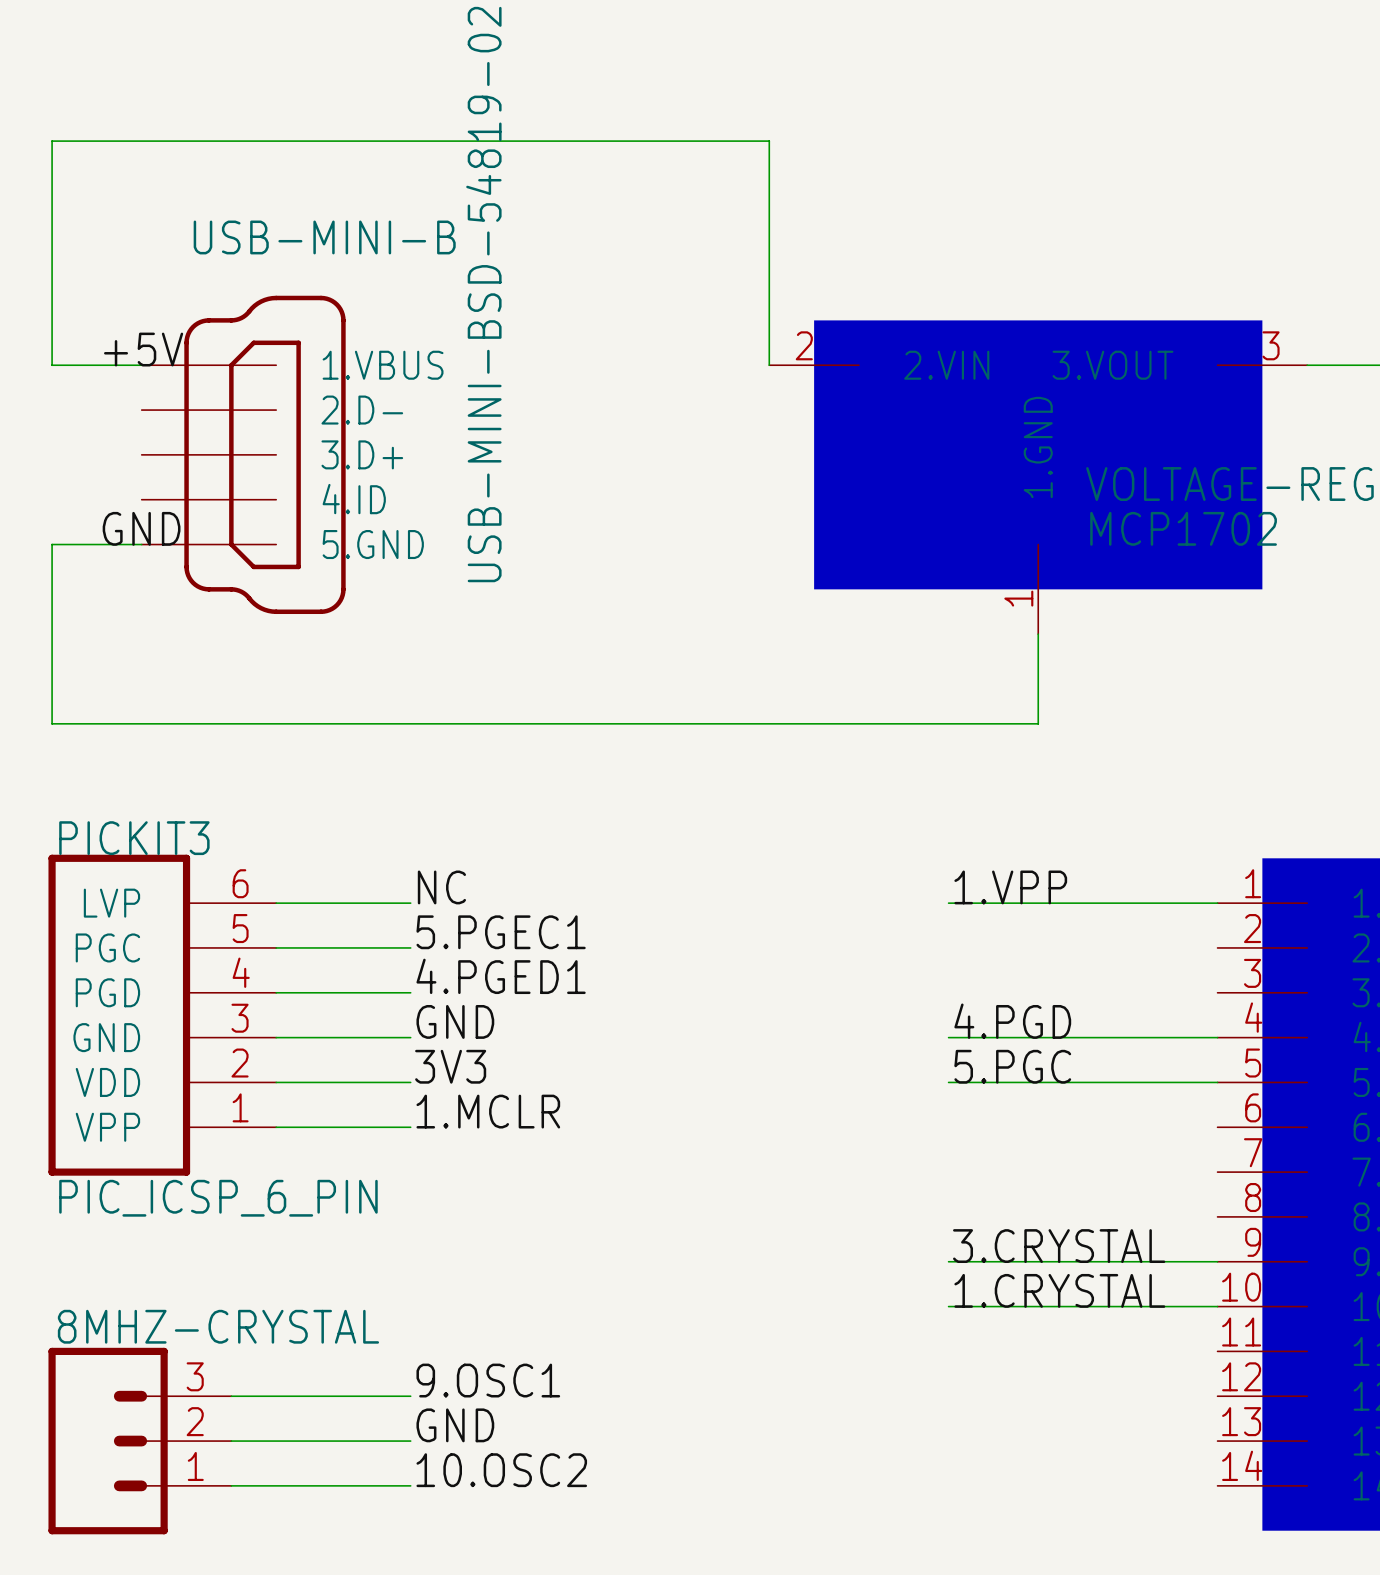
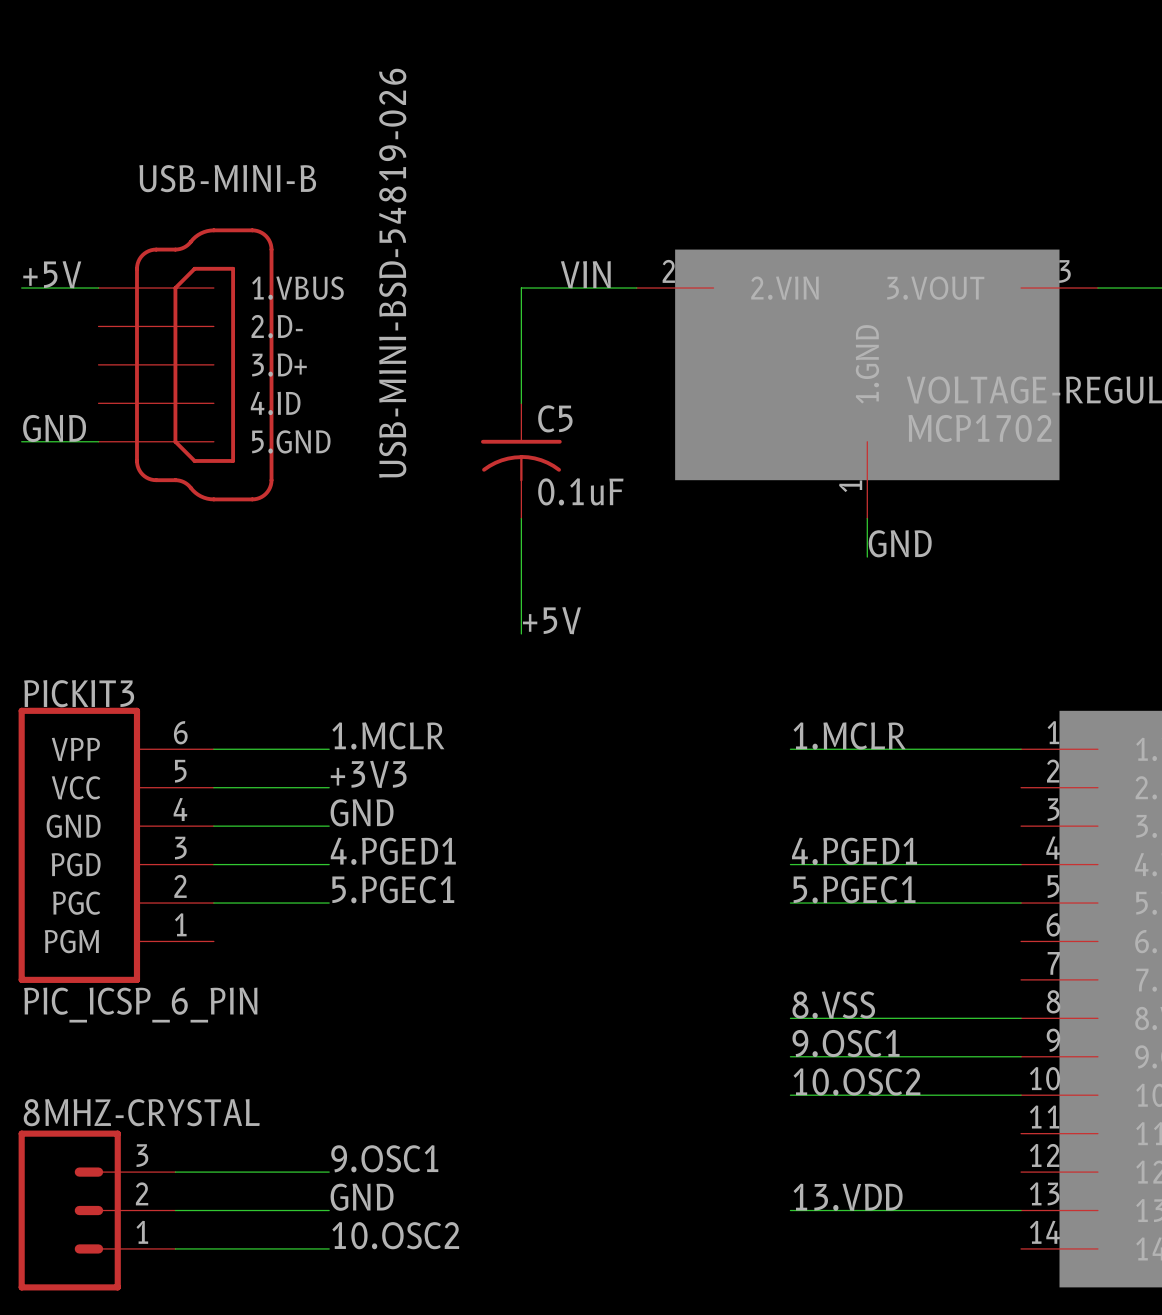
label position: +5V (143, 349) -> +5V (52, 274)
label: none -> VIN (585, 274)
wire: (52, 365) (52, 141) (769, 141) (769, 365) -> (521, 403) (521, 288) (636, 288)
label position: GND (141, 528) -> GND (54, 428)
wire: (52, 544) (52, 723) (1038, 723) (1038, 679) -> none
C5: none -> 0.1uF (521, 460)
wire: none -> (521, 518) (521, 633)
label: none -> GND (900, 543)
label: none -> +5V (551, 620)
label: NC (441, 887) -> 1.MCLR (388, 735)
label: 1.VPP (1010, 887) -> 1.MCLR (849, 735)
PICKIT3 pin name: LVP (111, 903) -> VPP (75, 749)
label: 5.PGEC1 (501, 932) -> +3V3 (368, 774)
PICKIT3 pin name: PGC (107, 947) -> VCC (76, 787)
label: 4.PGED1 (501, 976) -> GND (362, 812)
PICKIT3 pin name: PGD (107, 992) -> GND (73, 826)
label: GND (455, 1021) -> 4.PGED1 (393, 851)
label: 4.PGD (1012, 1021) -> 4.PGED1 (854, 851)
PICKIT3 pin name: GND (106, 1037) -> PGD (76, 864)
label: 3V3 (450, 1066) -> 5.PGEC1 (393, 889)
label: 5.PGC (1012, 1066) -> 5.PGEC1 (854, 889)
PICKIT3 pin name: VDD (107, 1082) -> PGC (76, 903)
label: 1.MCLR (488, 1111) -> none
PICKIT3 pin name: VPP (107, 1127) -> PGM (71, 941)
wire: (276, 1127) (410, 1127) -> none
label: none -> 8.VSS (833, 1005)
wire: none -> (790, 1018) (1021, 1018)
label: 3.CRYSTAL (1059, 1246) -> 9.OSC1 (846, 1043)
label: 1.CRYSTAL (1059, 1290) -> 10.OSC2 (856, 1081)
label: none -> 13.VDD (848, 1197)
wire: none -> (790, 1210) (1021, 1210)

